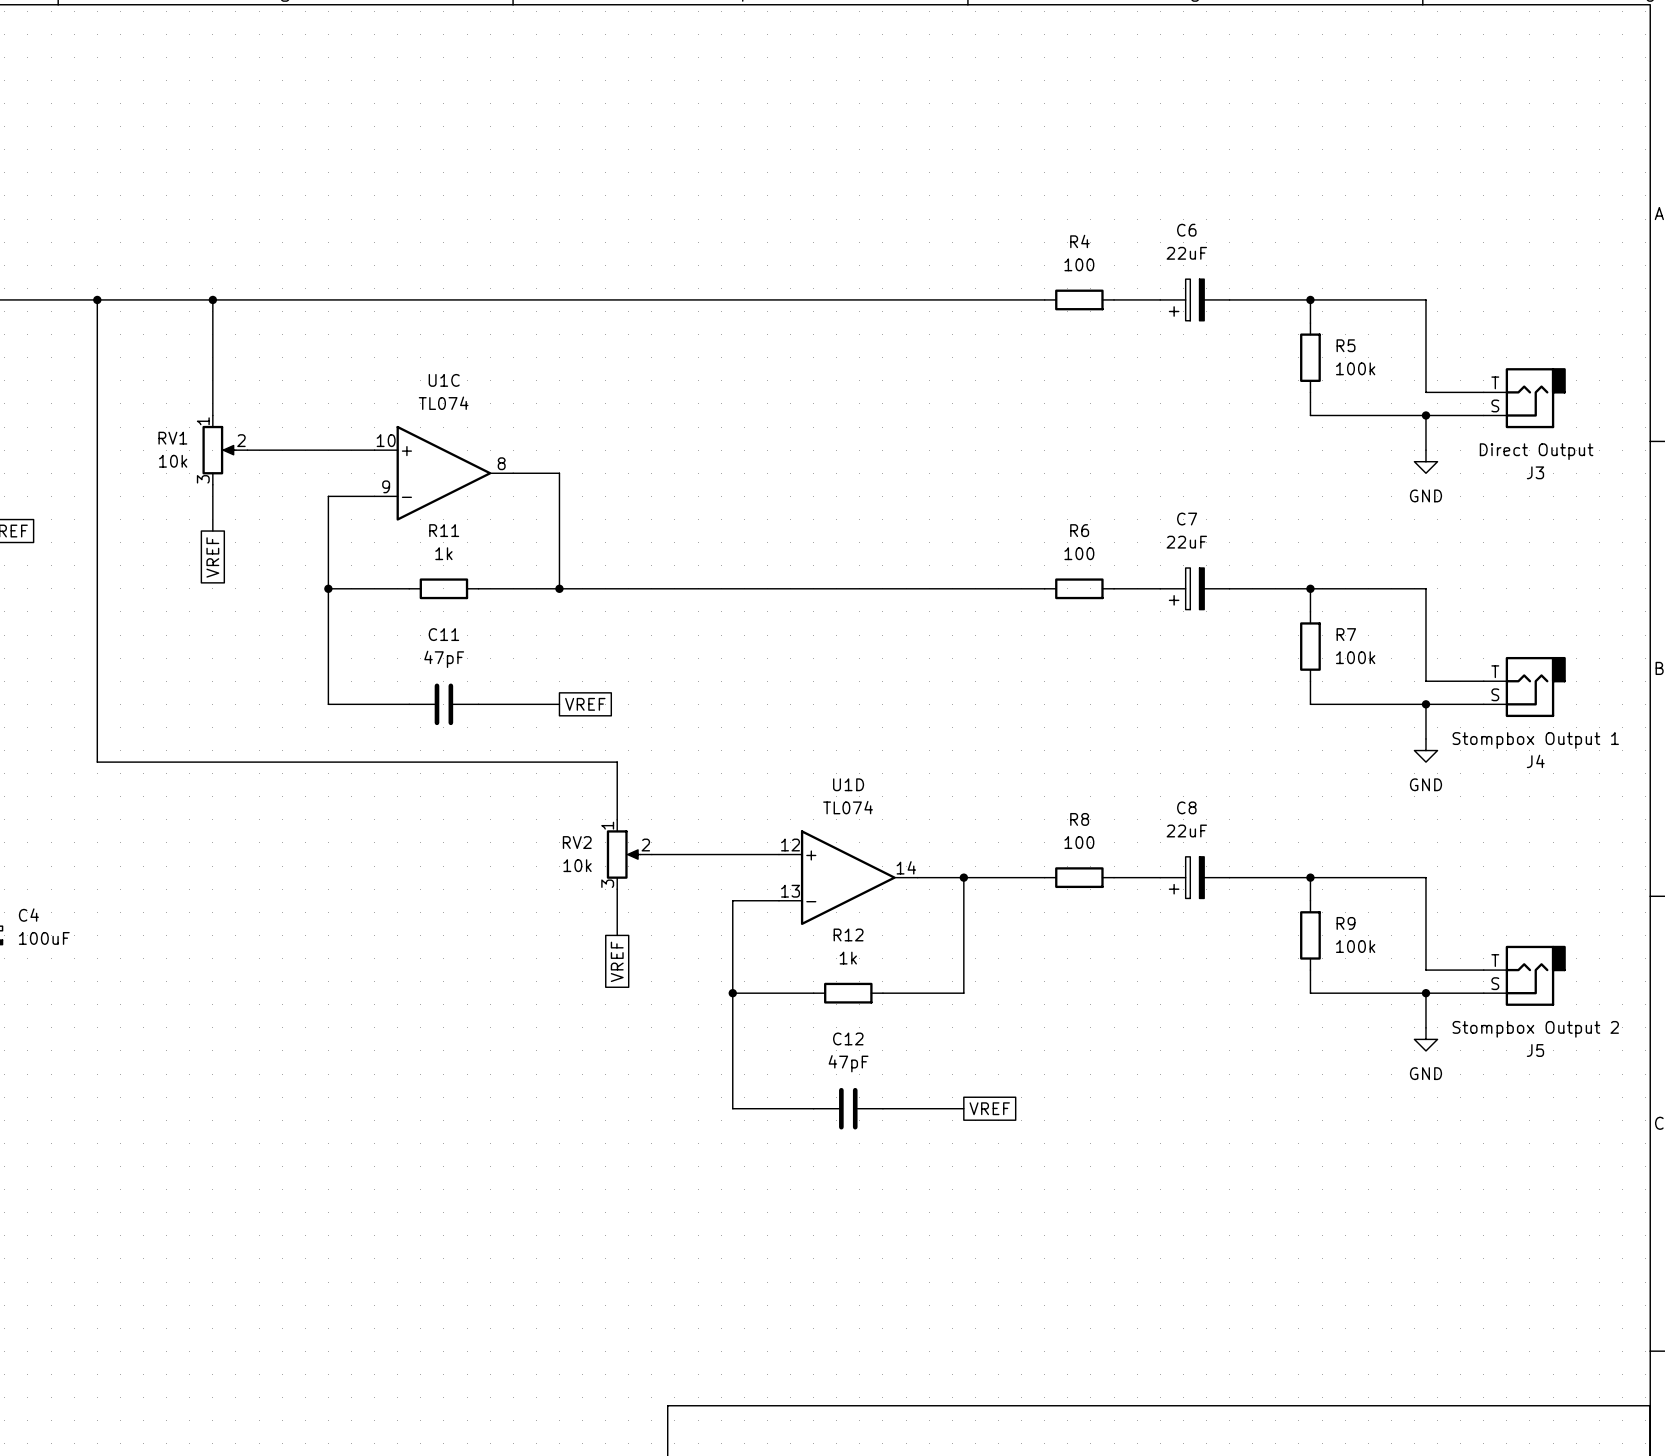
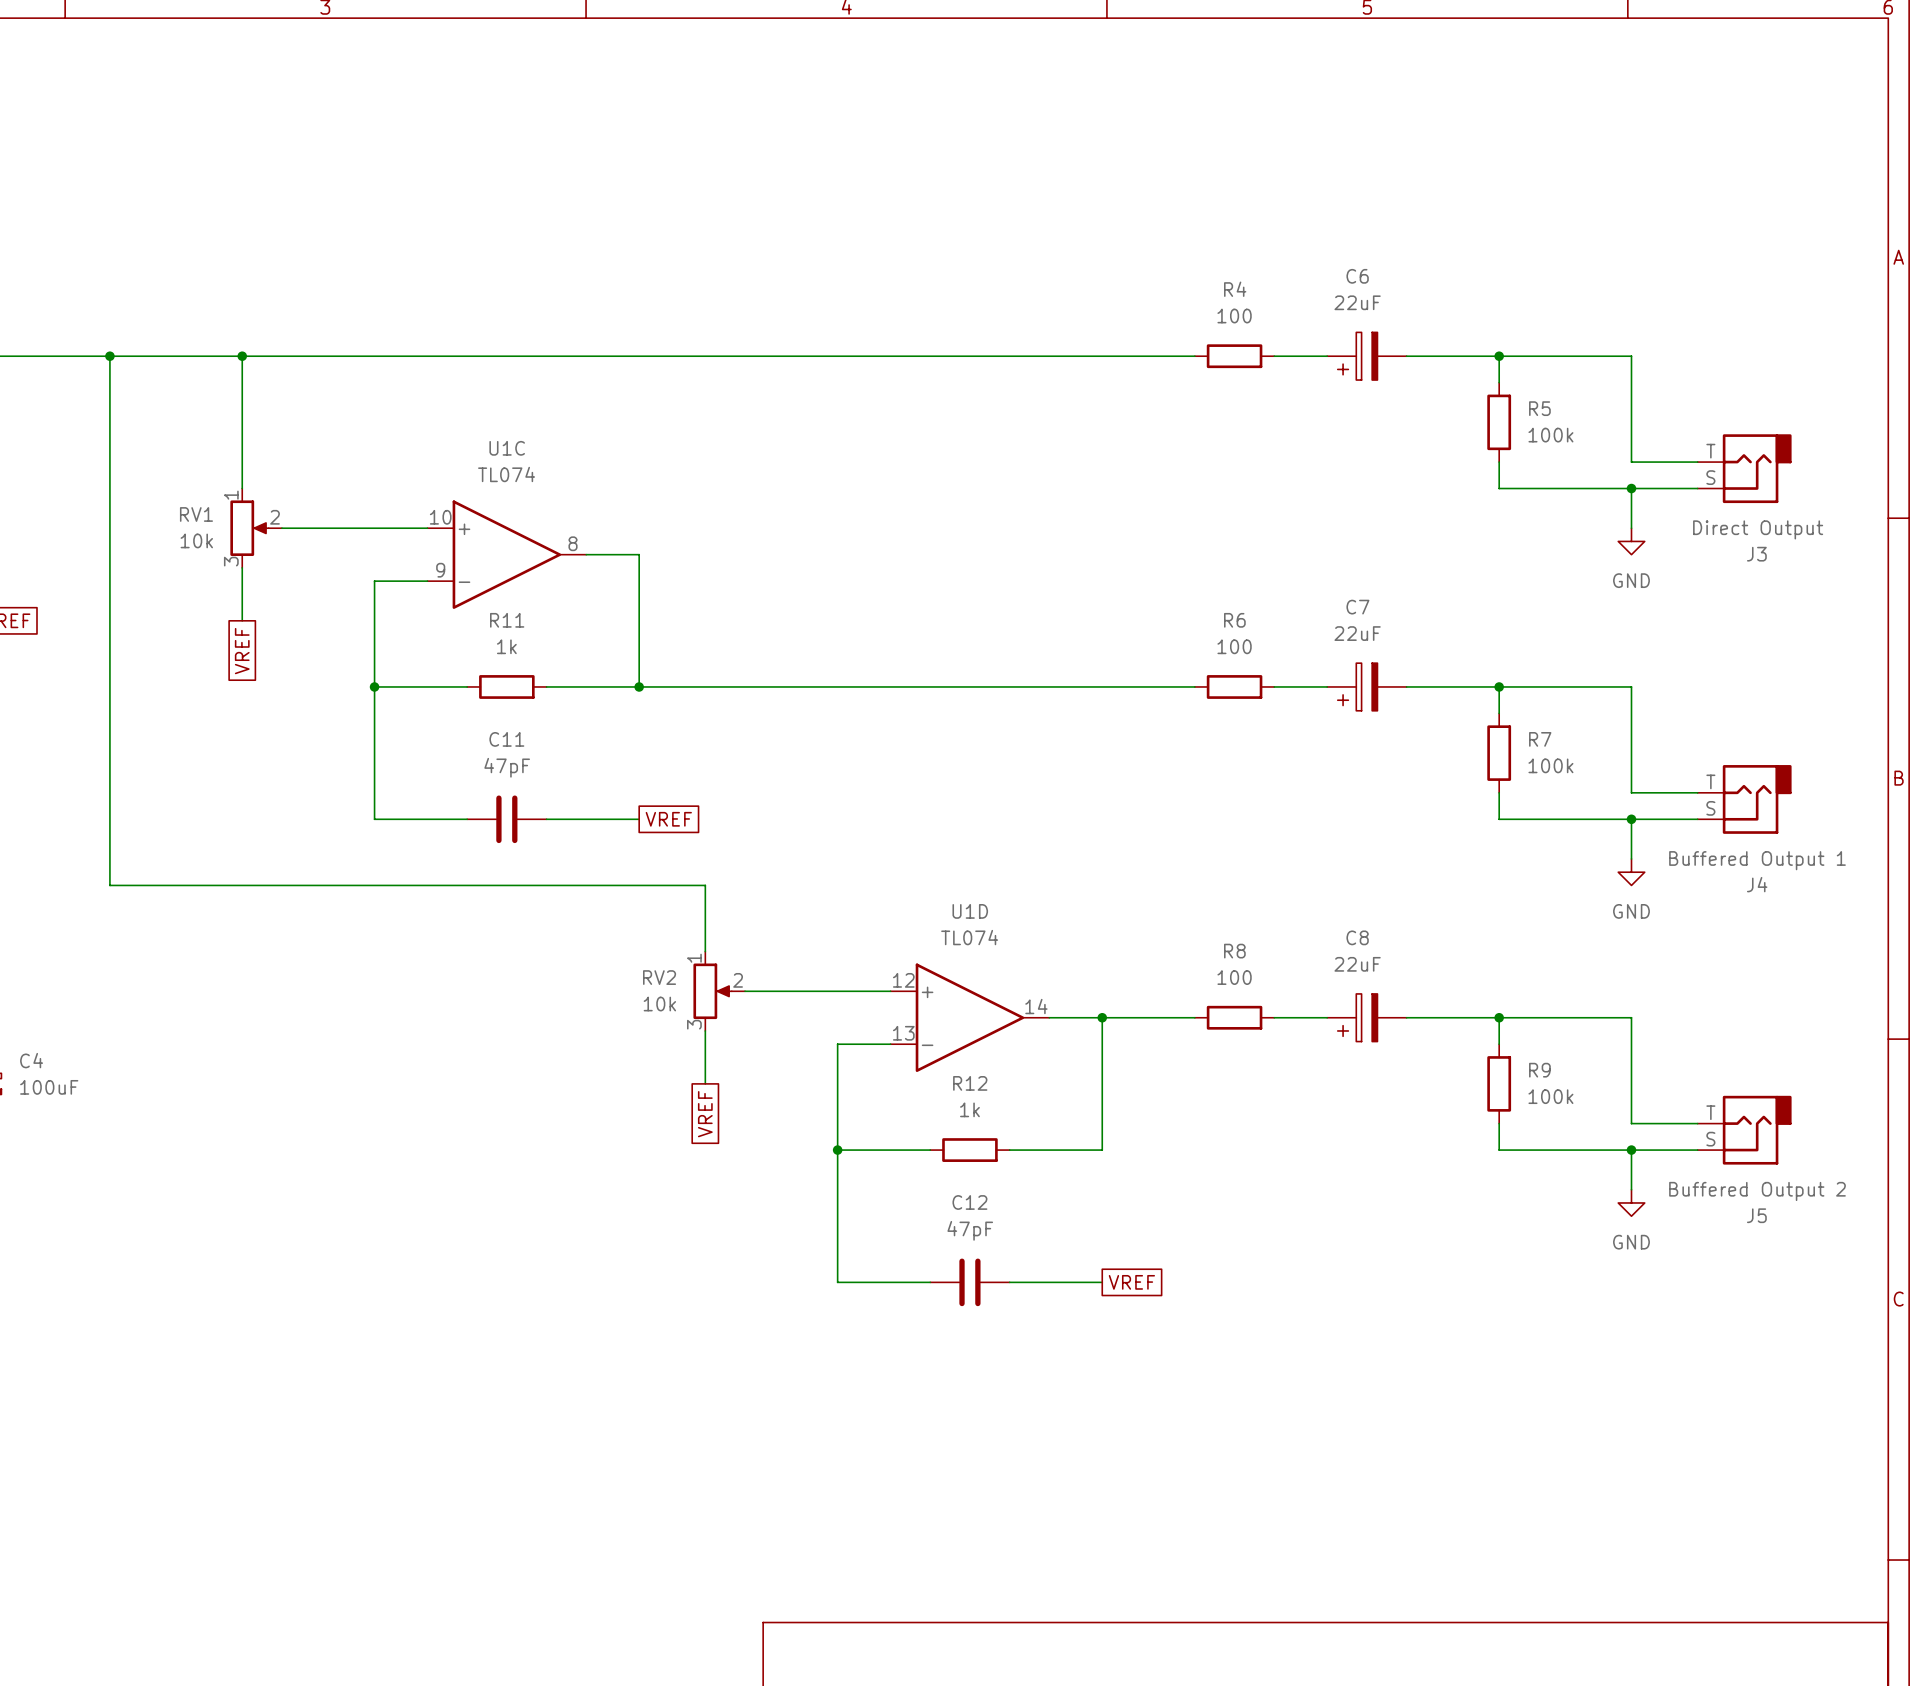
J4 value: Stompbox Output 1 (1535, 740) -> Buffered Output 1 (1757, 860)
J5 value: Stompbox Output 2 (1535, 1029) -> Buffered Output 2 (1757, 1191)

